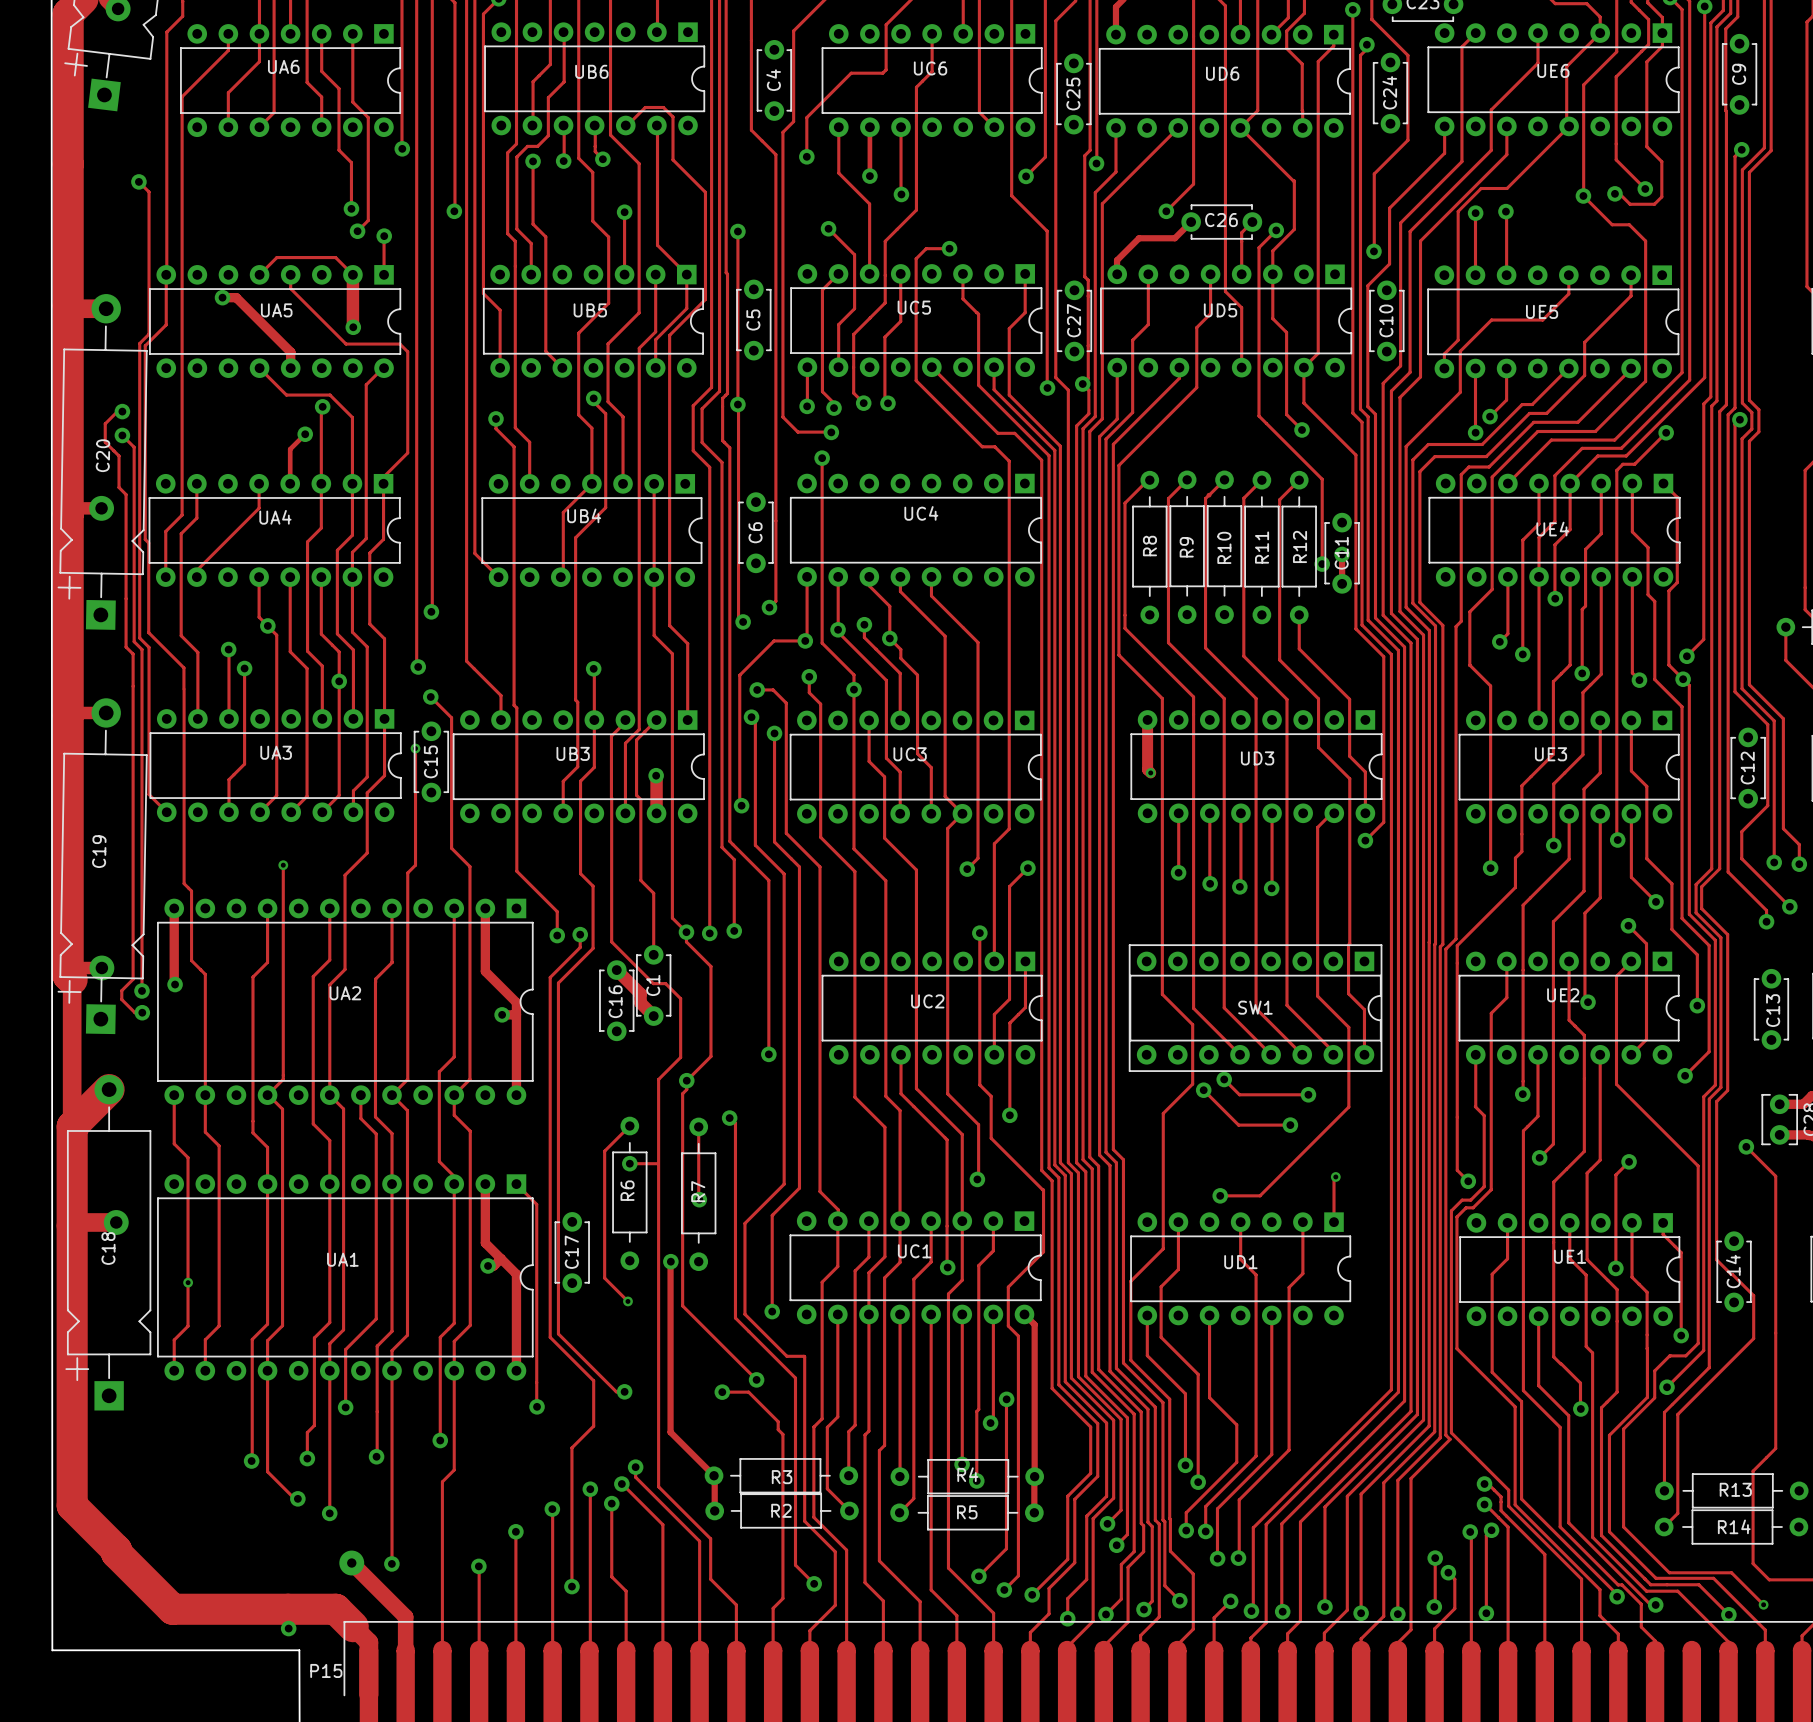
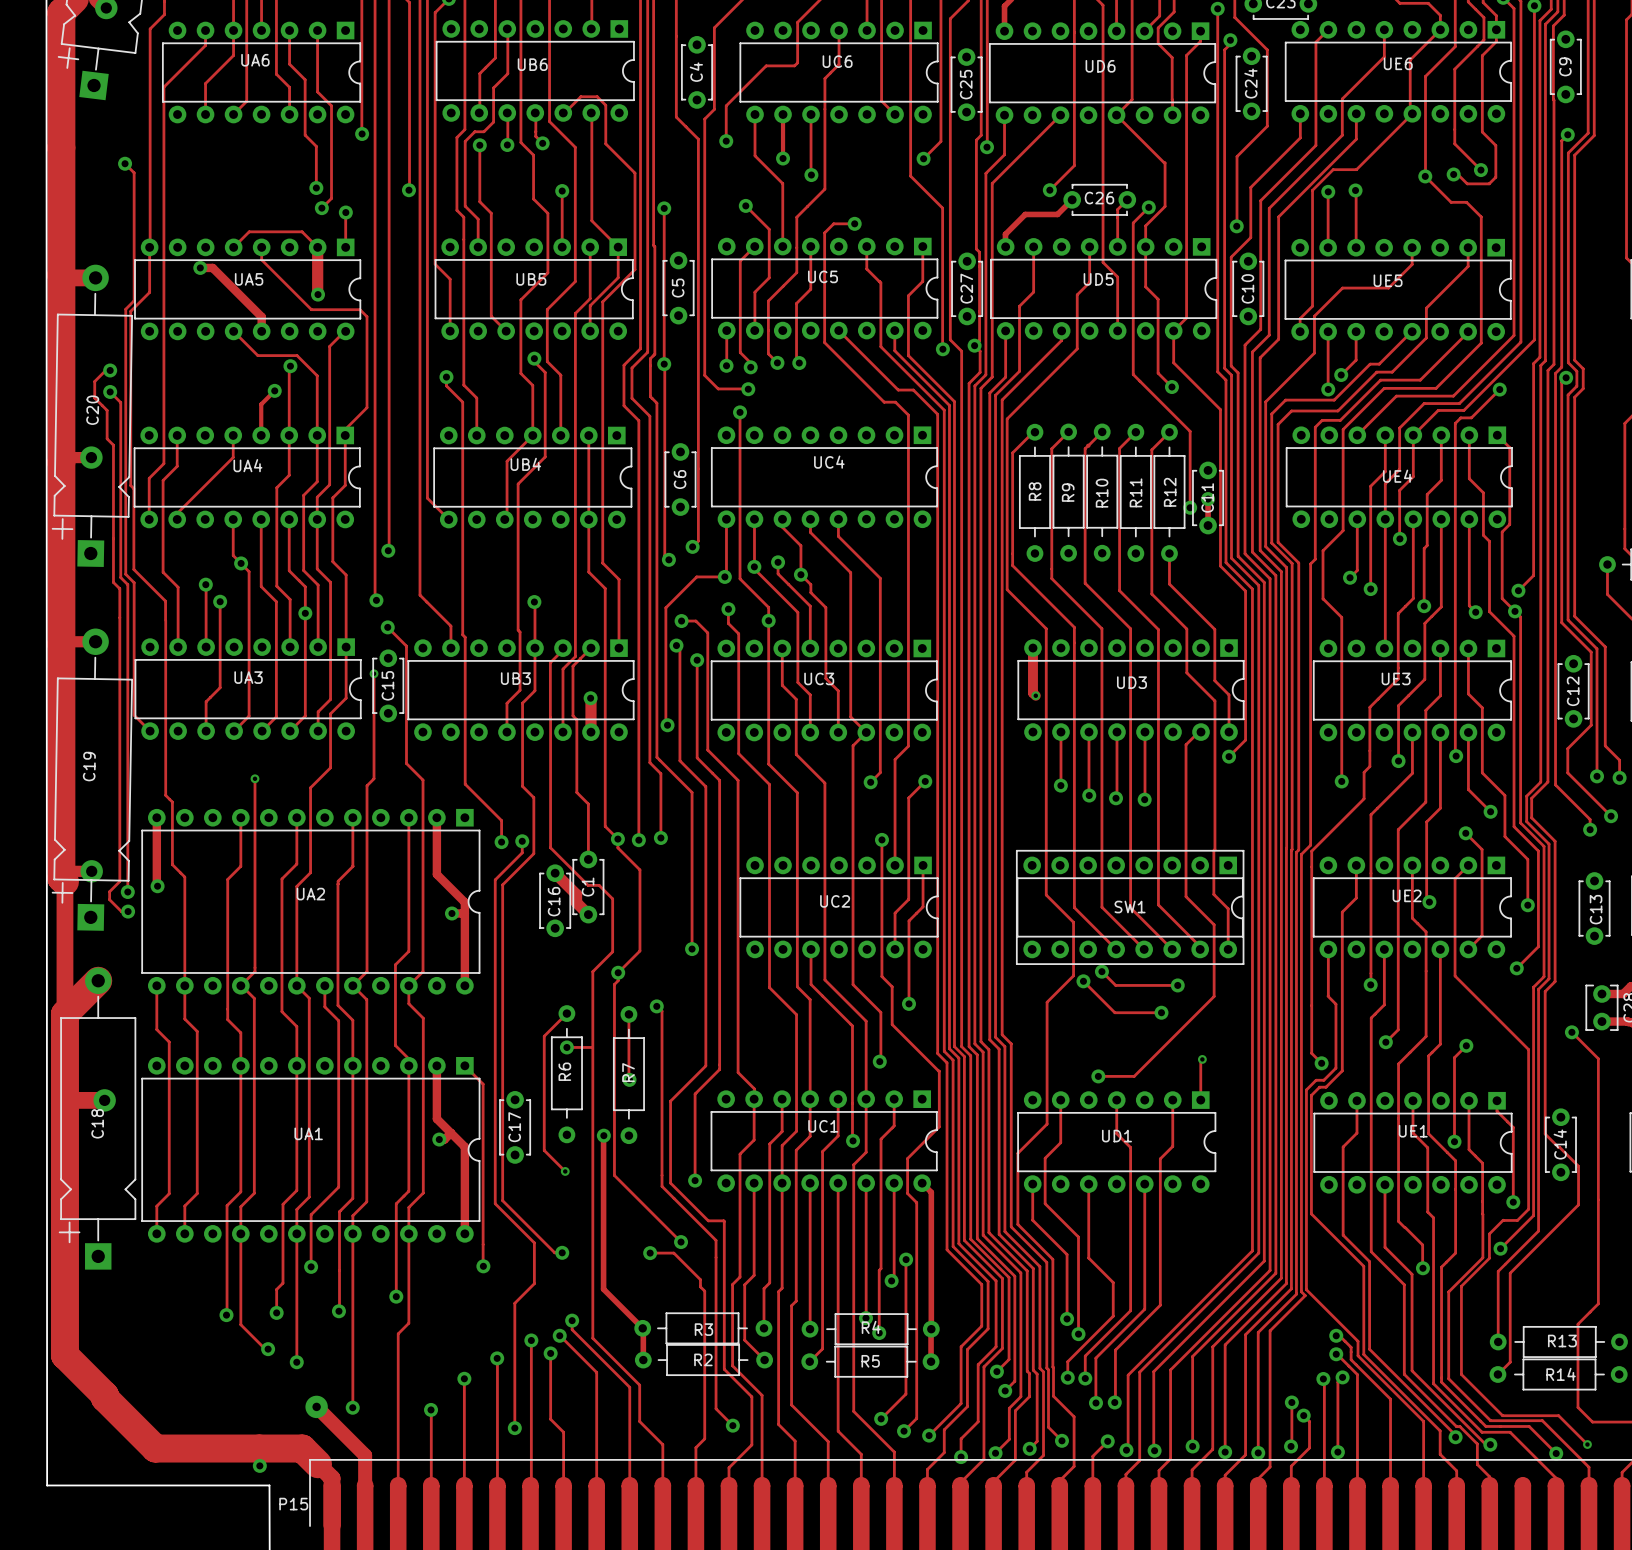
via: (188, 1282) -> none

